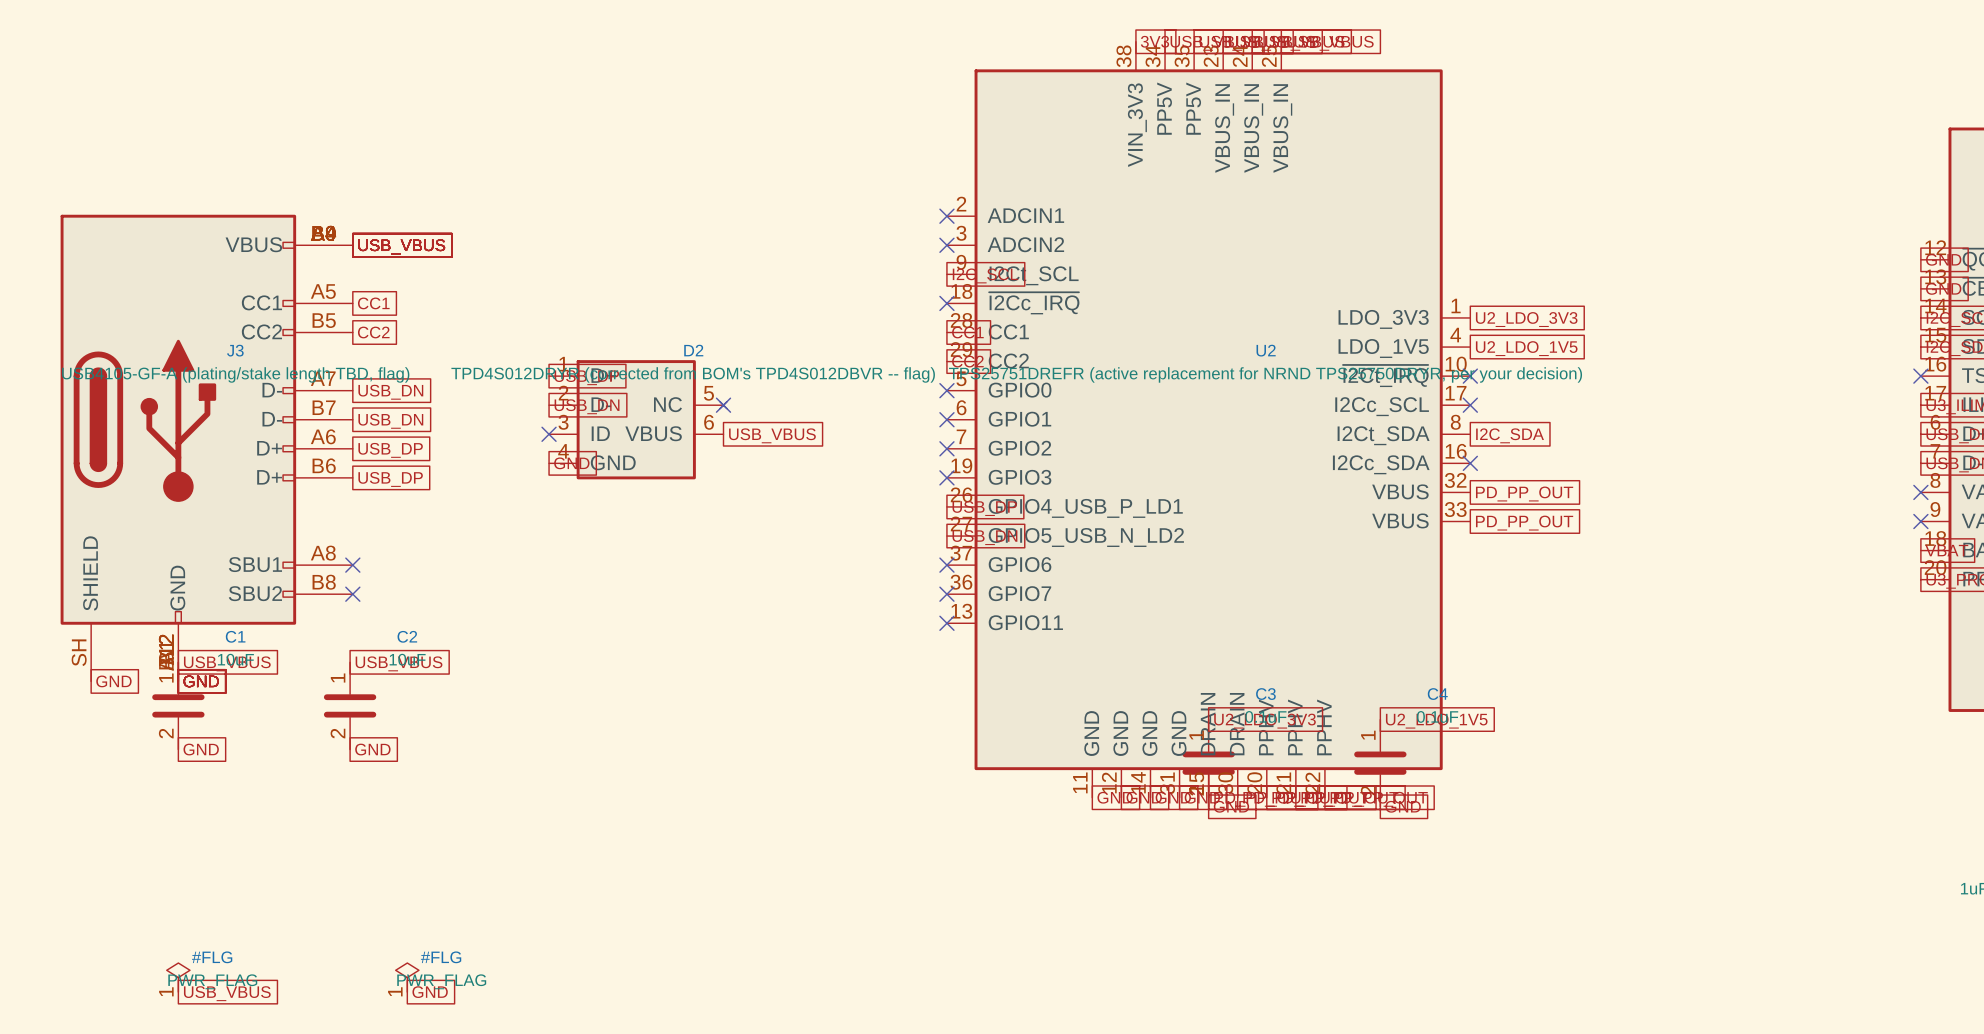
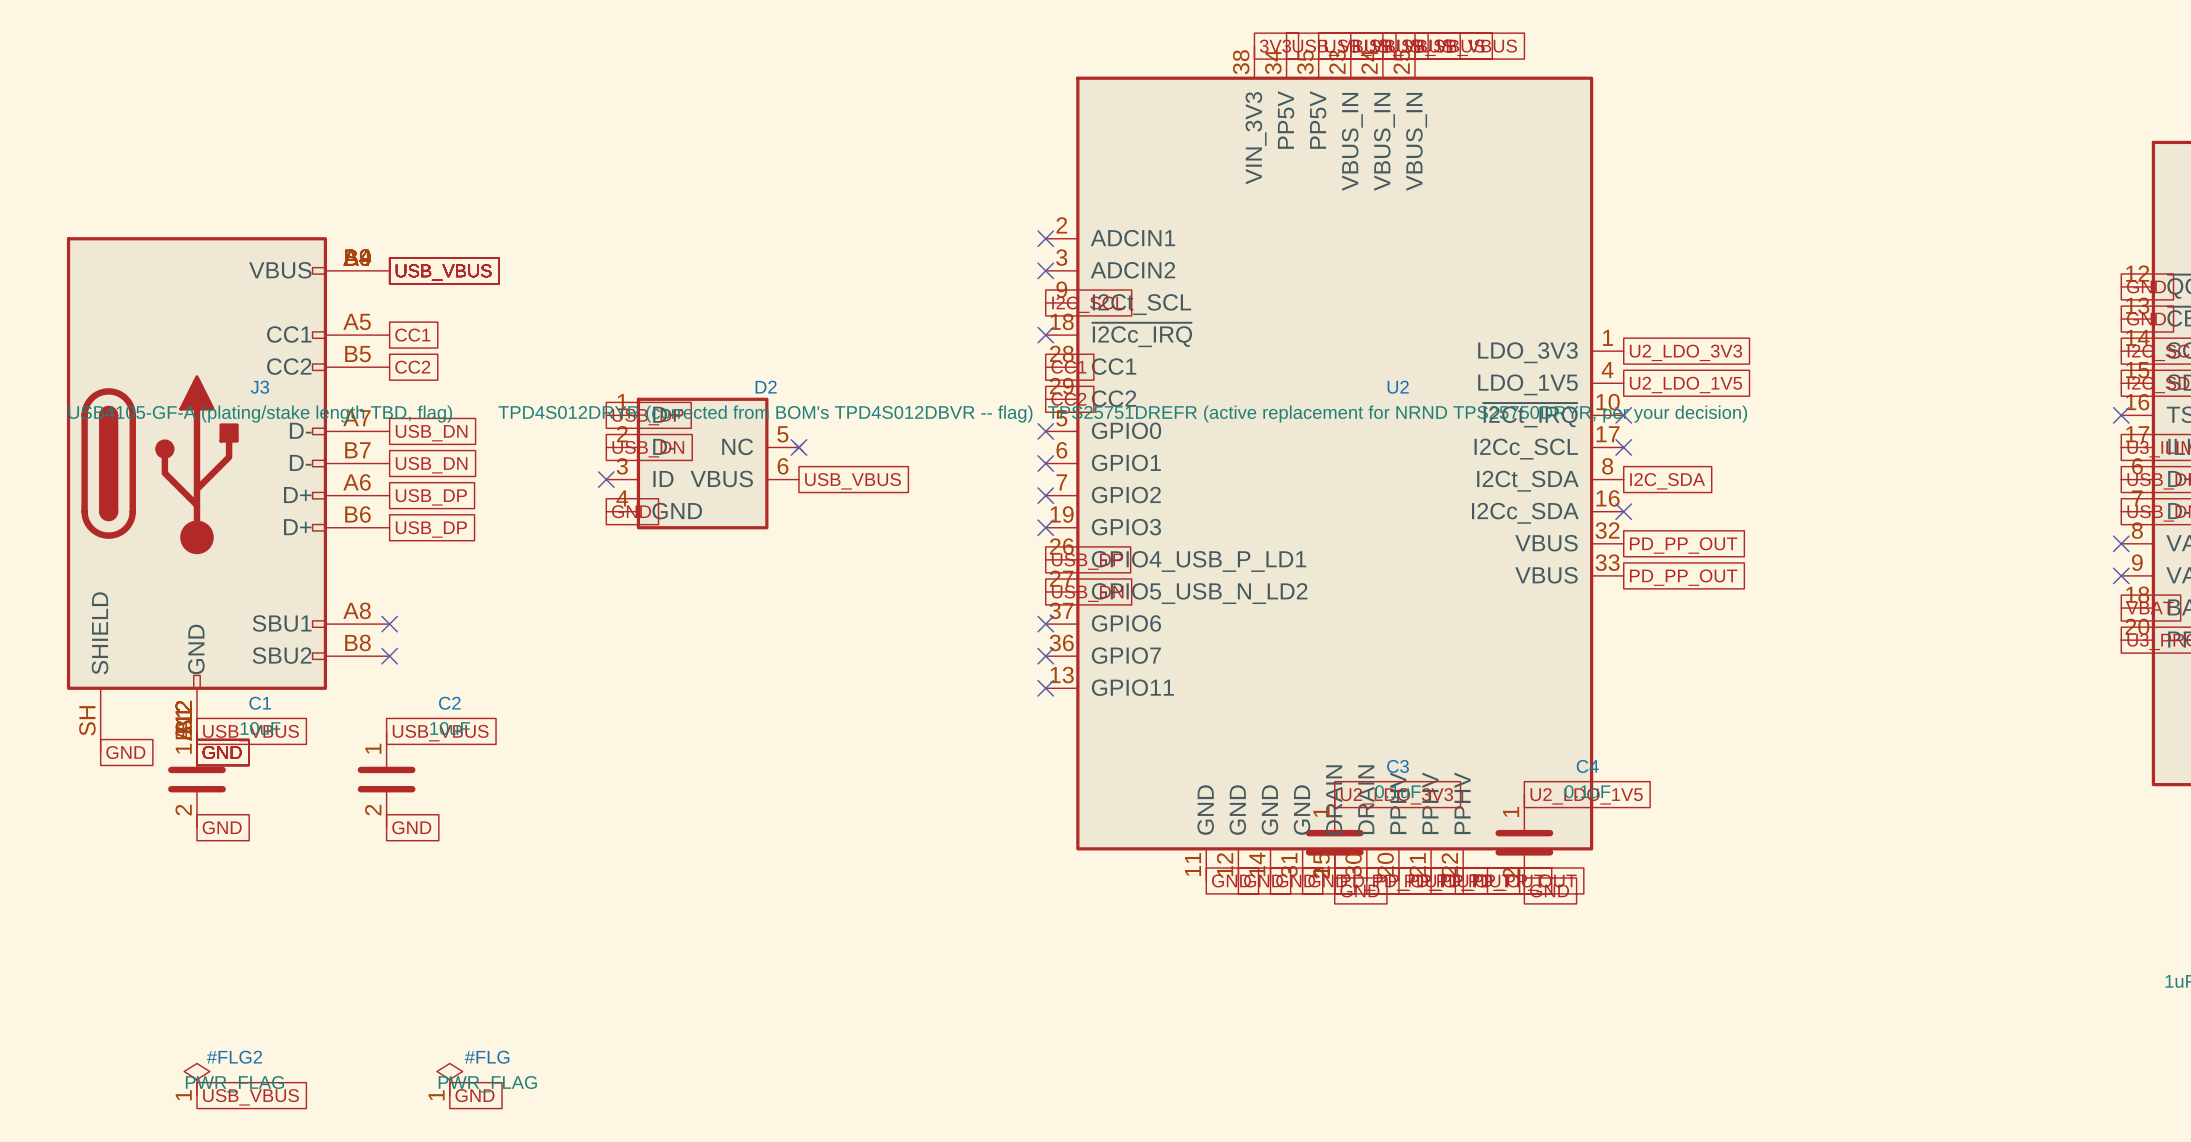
#FLG name: #FLG (212, 957) -> #FLG2 (234, 1057)

